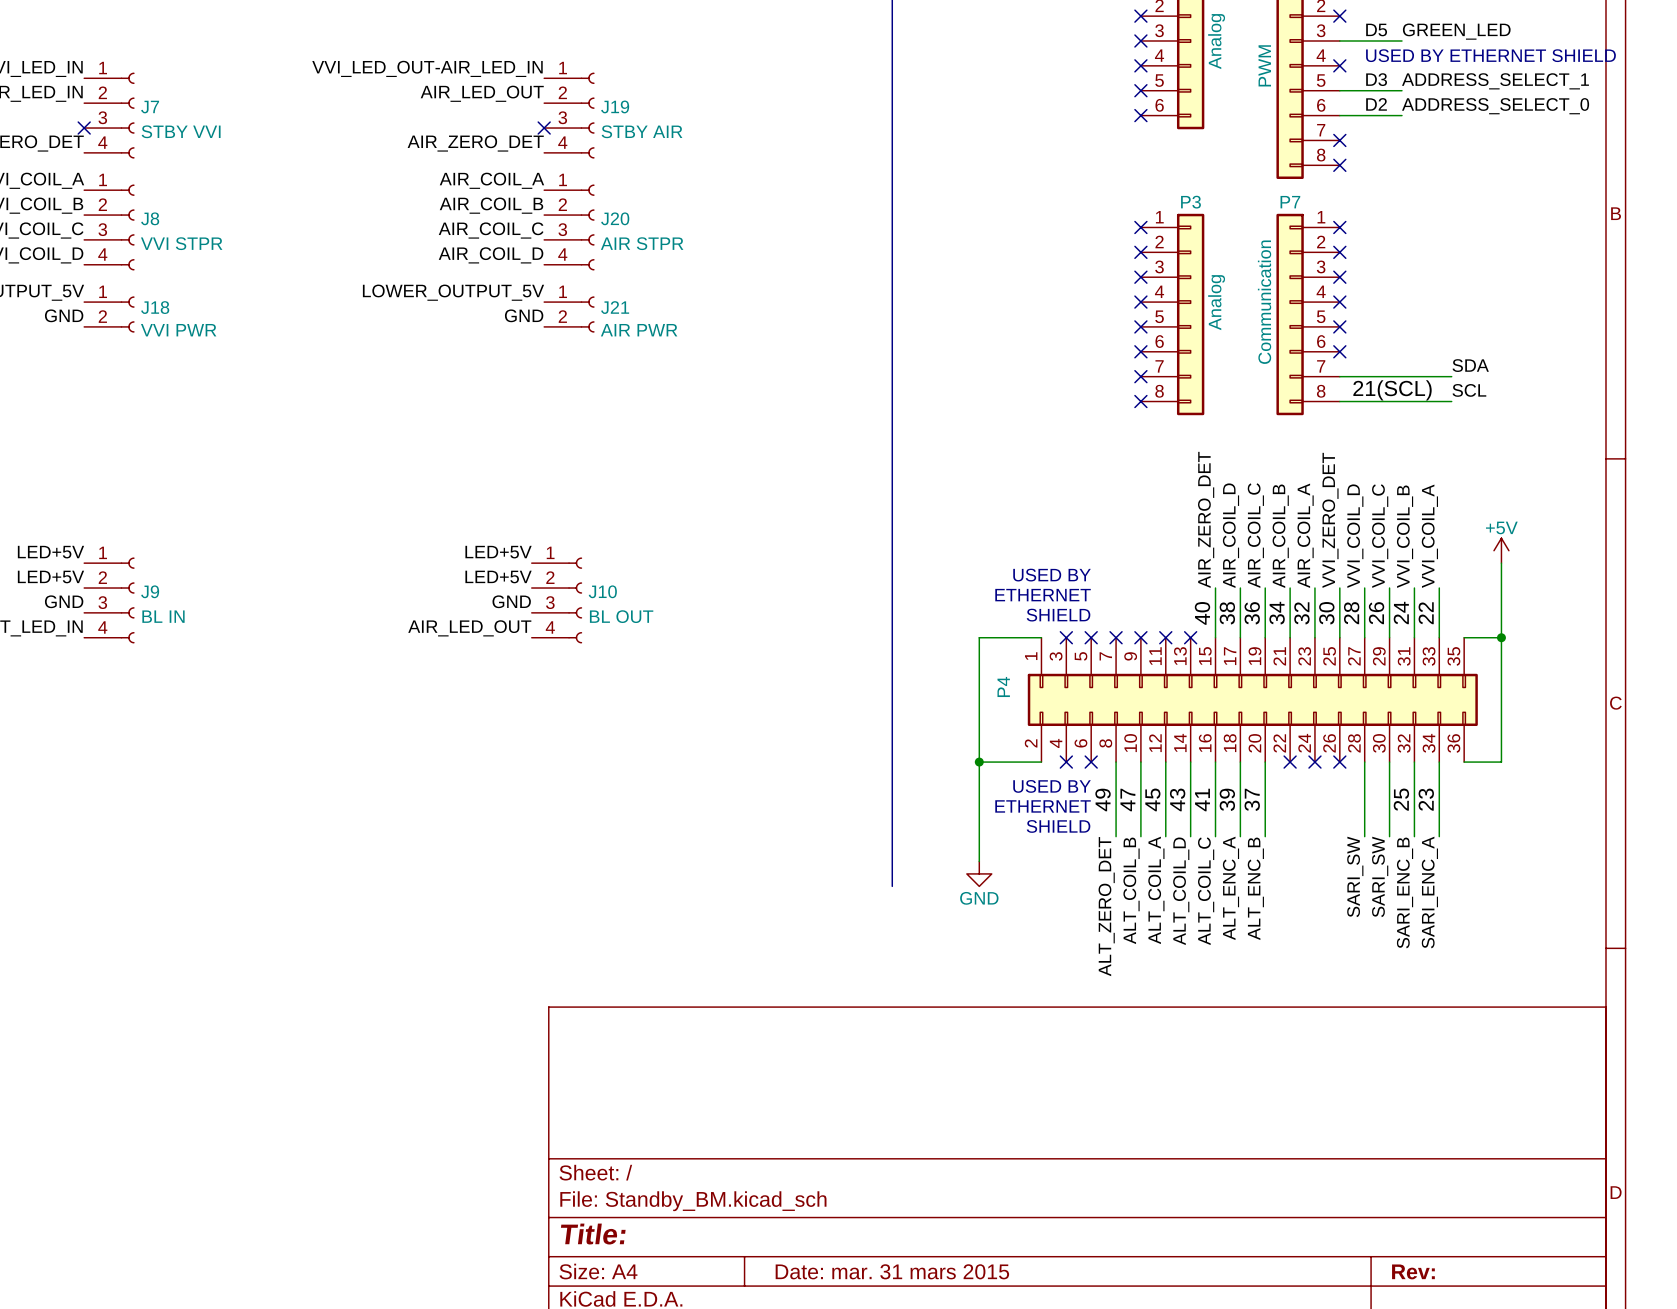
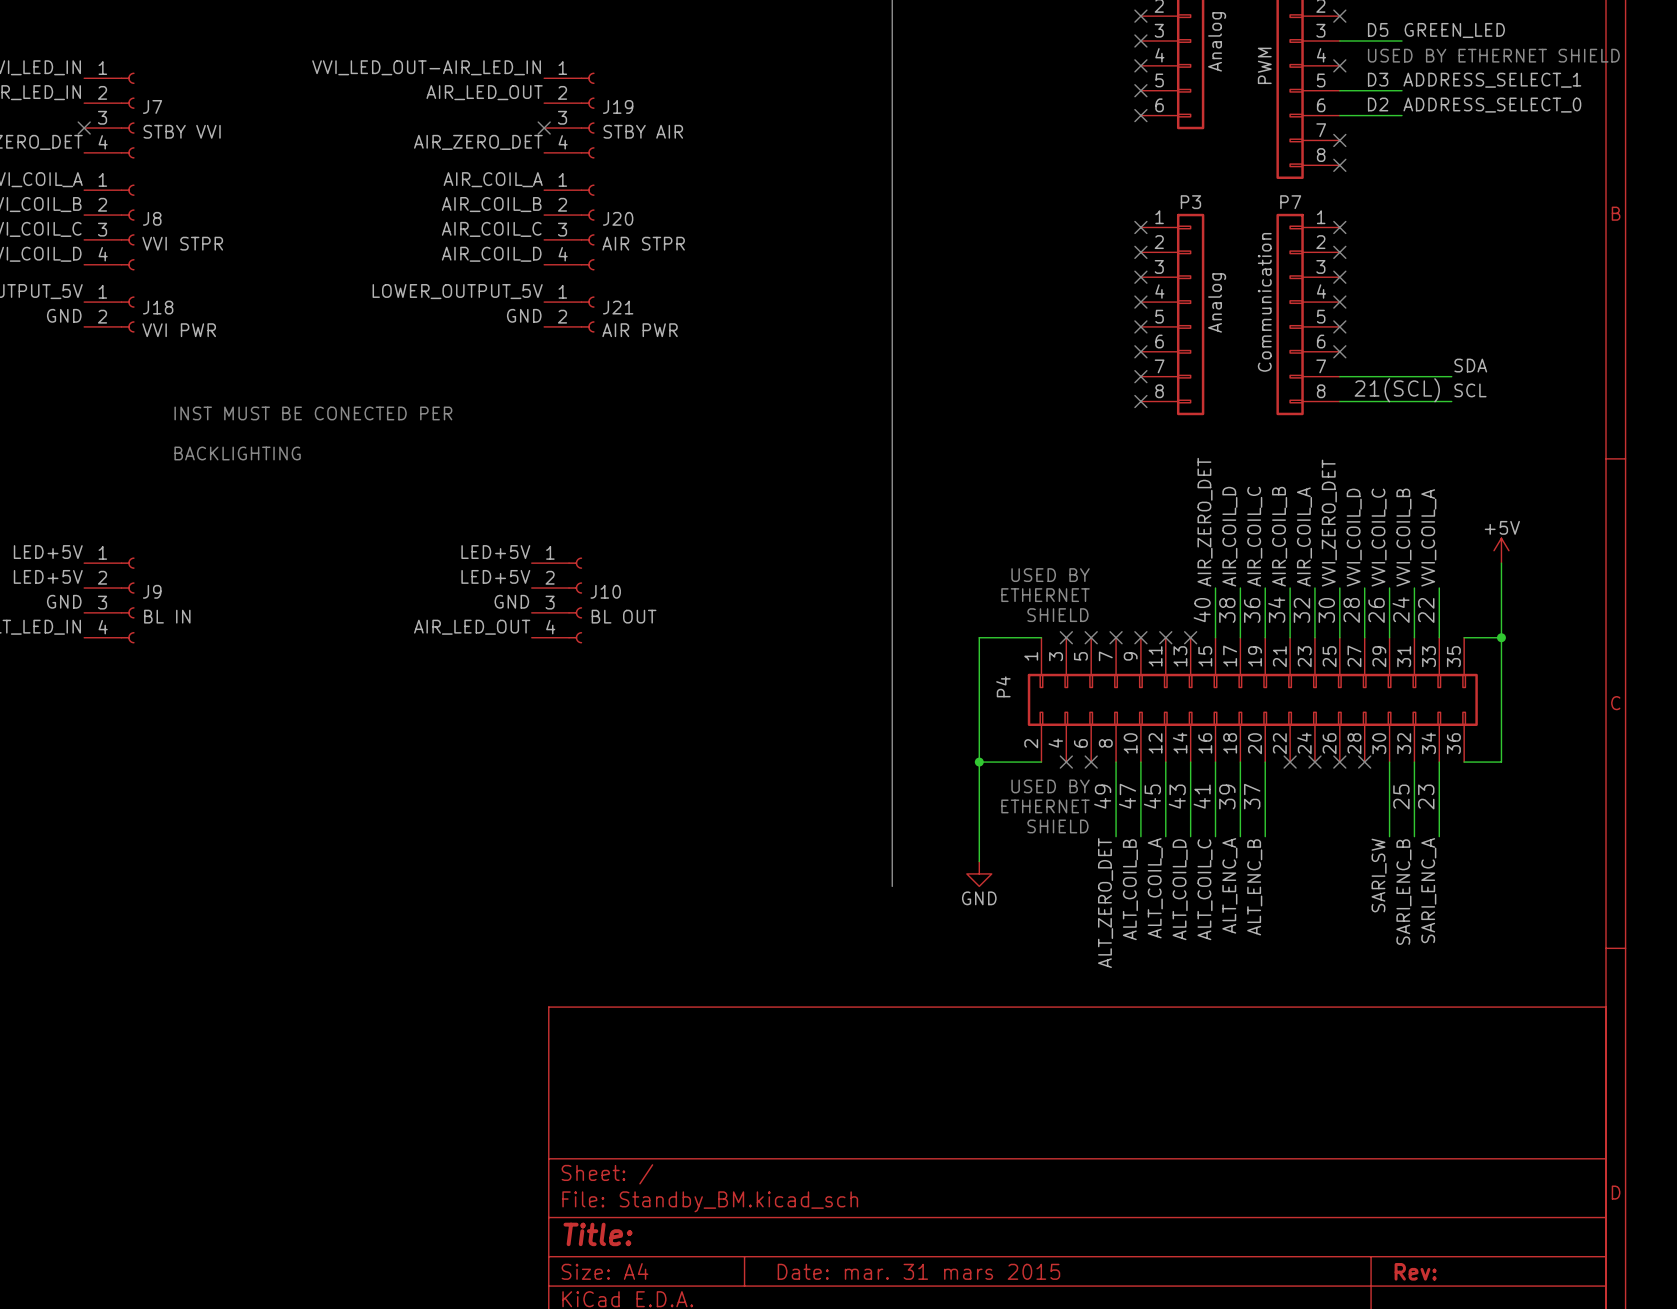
text: none -> INST MUST BE CONECTED PER (313, 413)
text: none -> BACKLIGHTING (237, 453)
wire: (1364, 762) (1364, 836) -> none
no-connect mark: none -> (1364, 762)
label: SARI_SW (1355, 876) -> none

